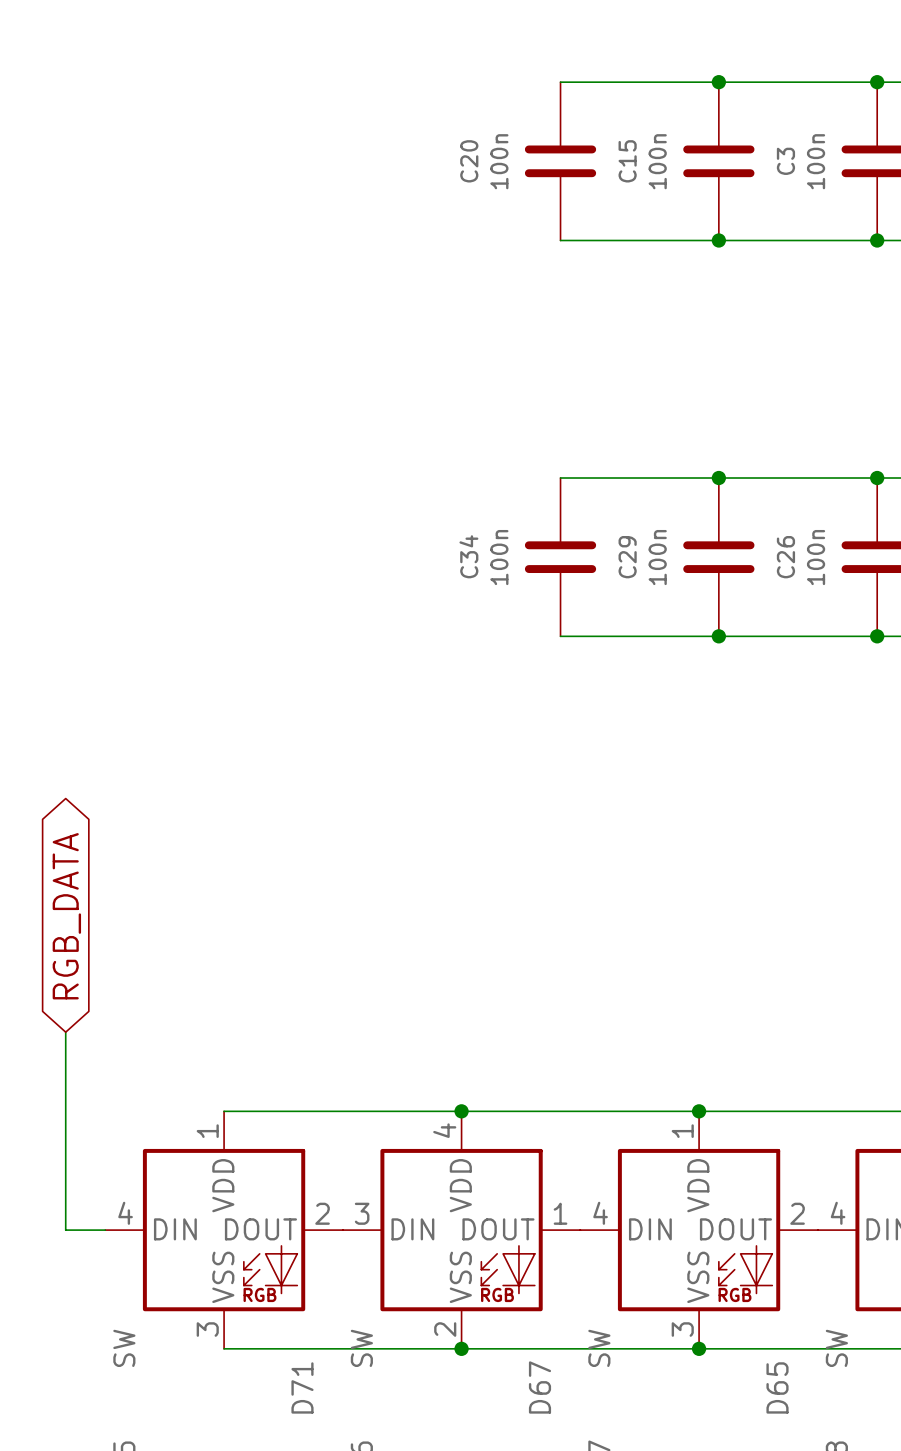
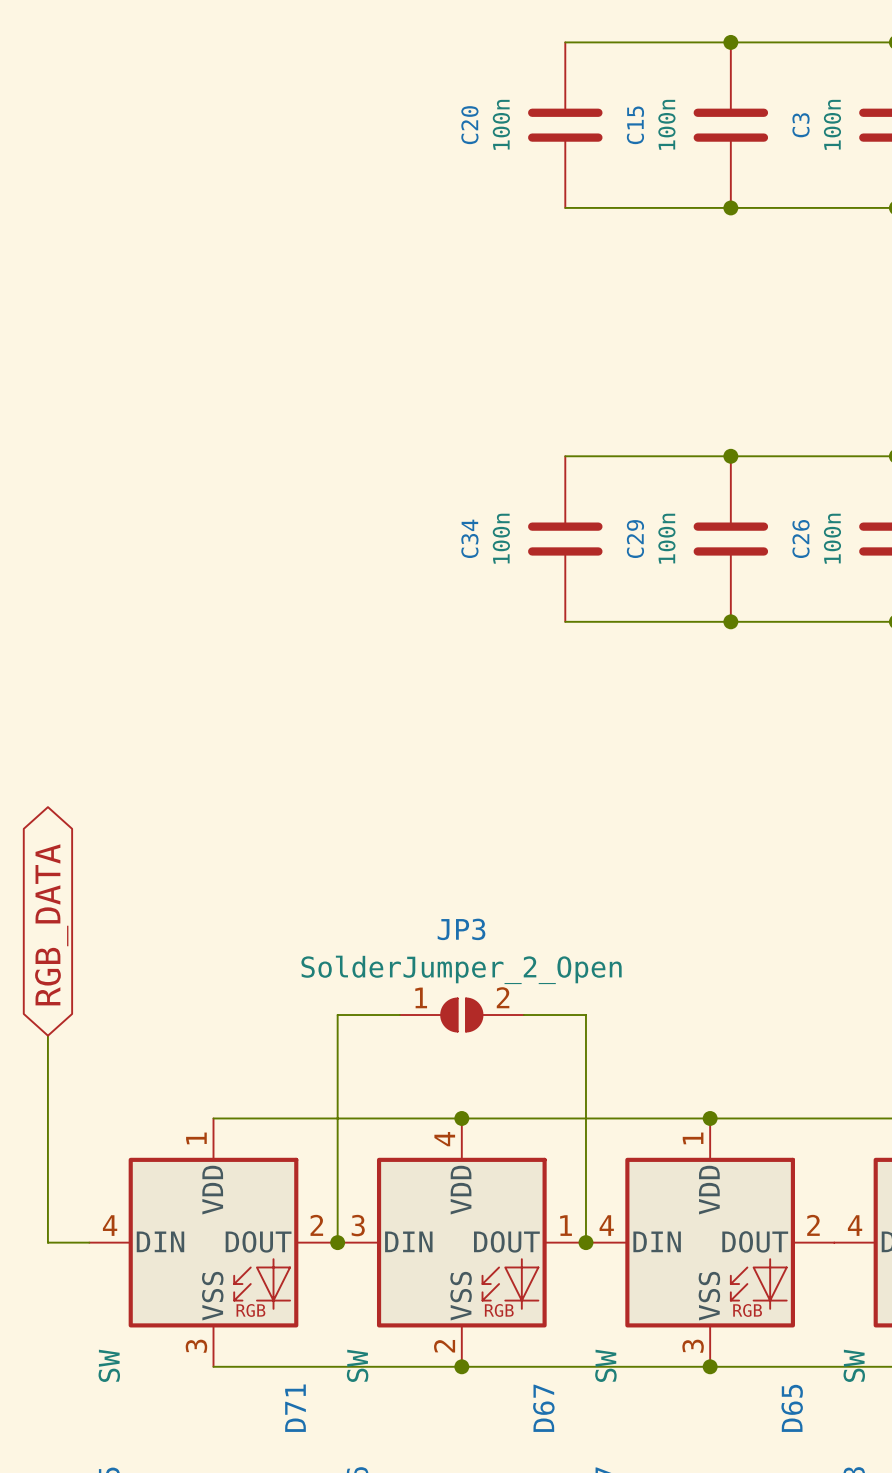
wire: none -> (399, 1015) (337, 1015) (337, 1242)
JP3: none -> SolderJumper_2_Open (461, 1015)
wire: none -> (523, 1015) (585, 1015) (585, 1242)
junction: none -> (337, 1242)
junction: none -> (585, 1242)

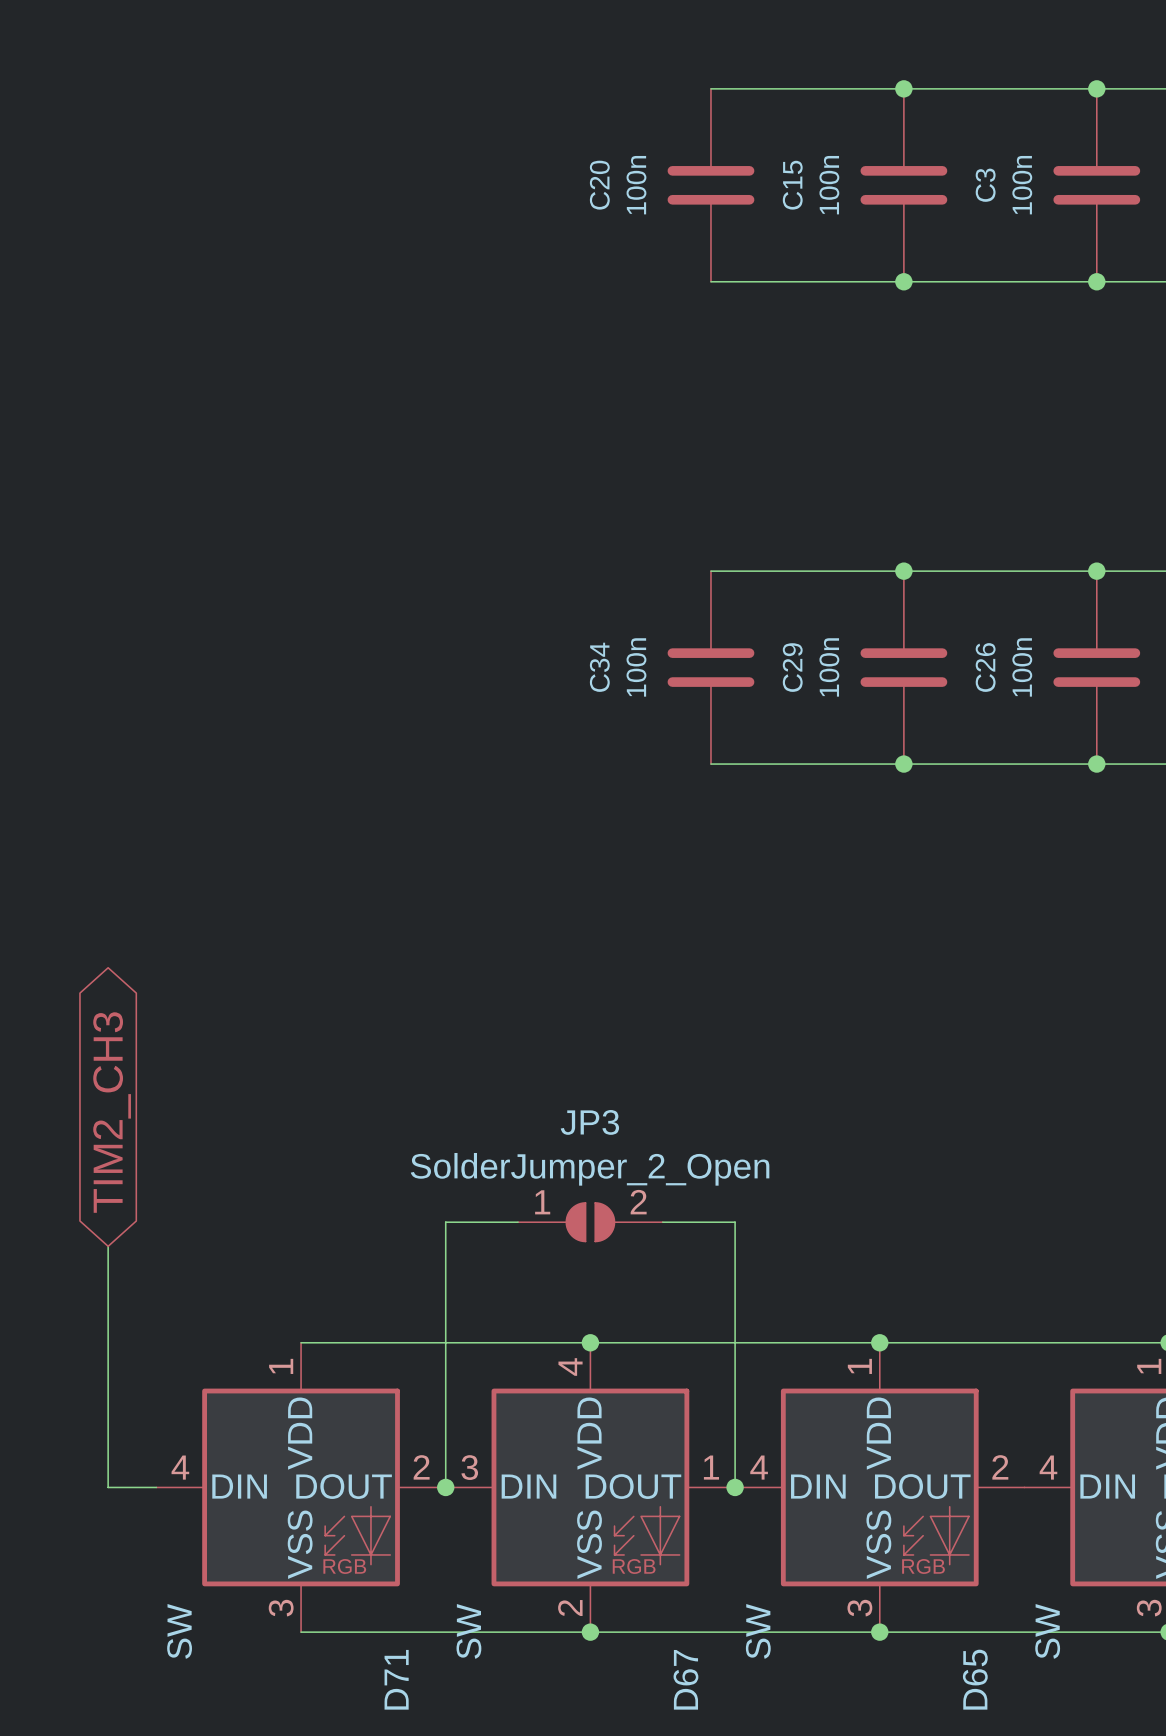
global label: RGB_DATA (51, 924) -> TIM2_CH3 (112, 1112)

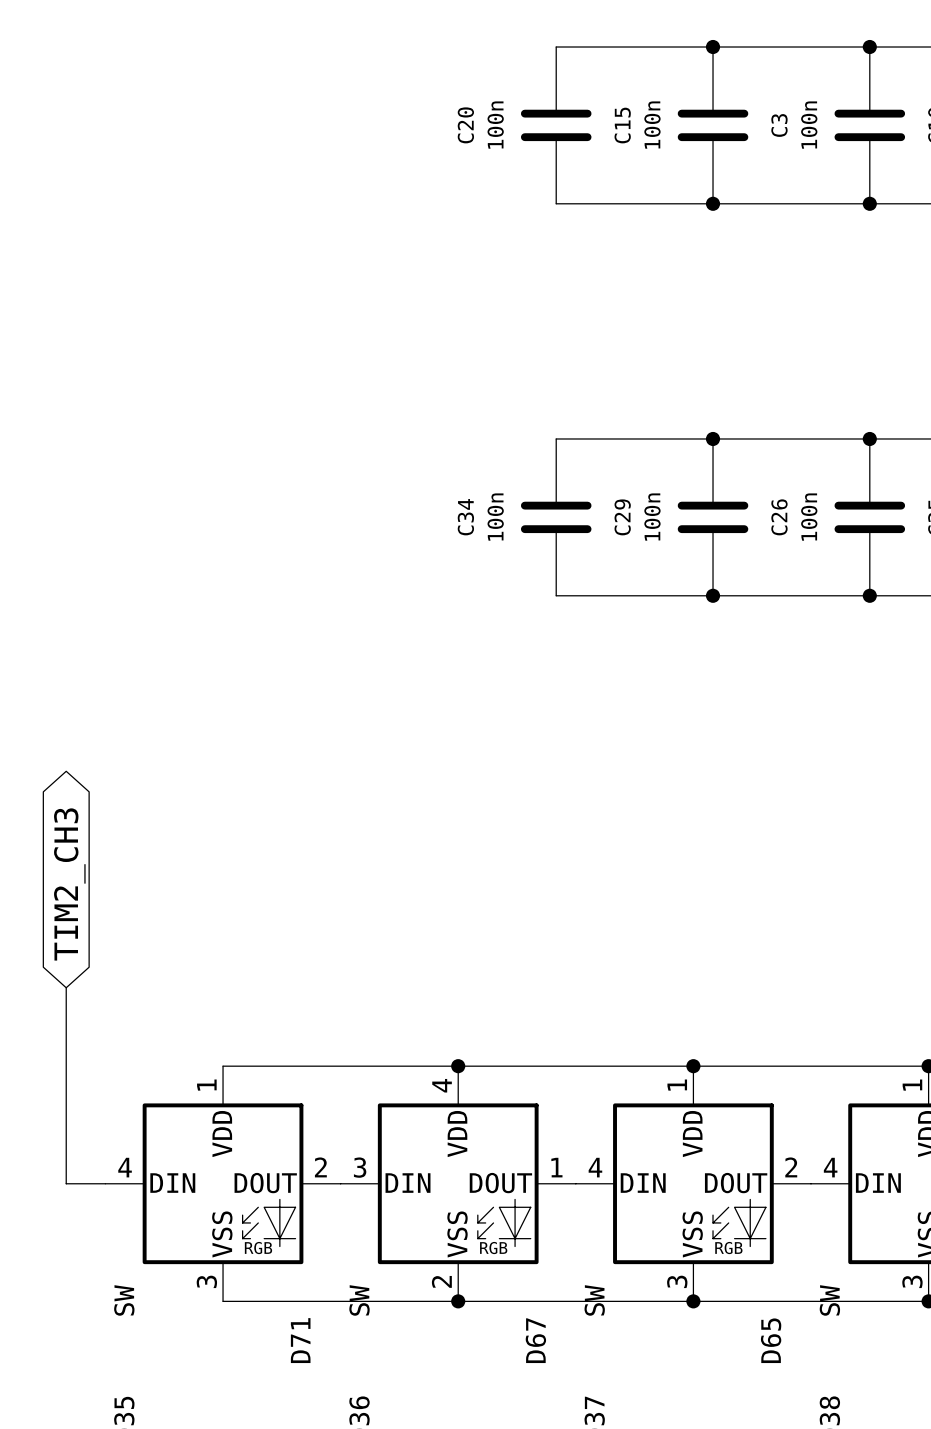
wire: (518, 1222) (445, 1222) (445, 1487) -> none
JP3: SolderJumper_2_Open (590, 1222) -> none
wire: (662, 1222) (735, 1222) (735, 1487) -> none
junction: (445, 1487) -> none
junction: (735, 1487) -> none

